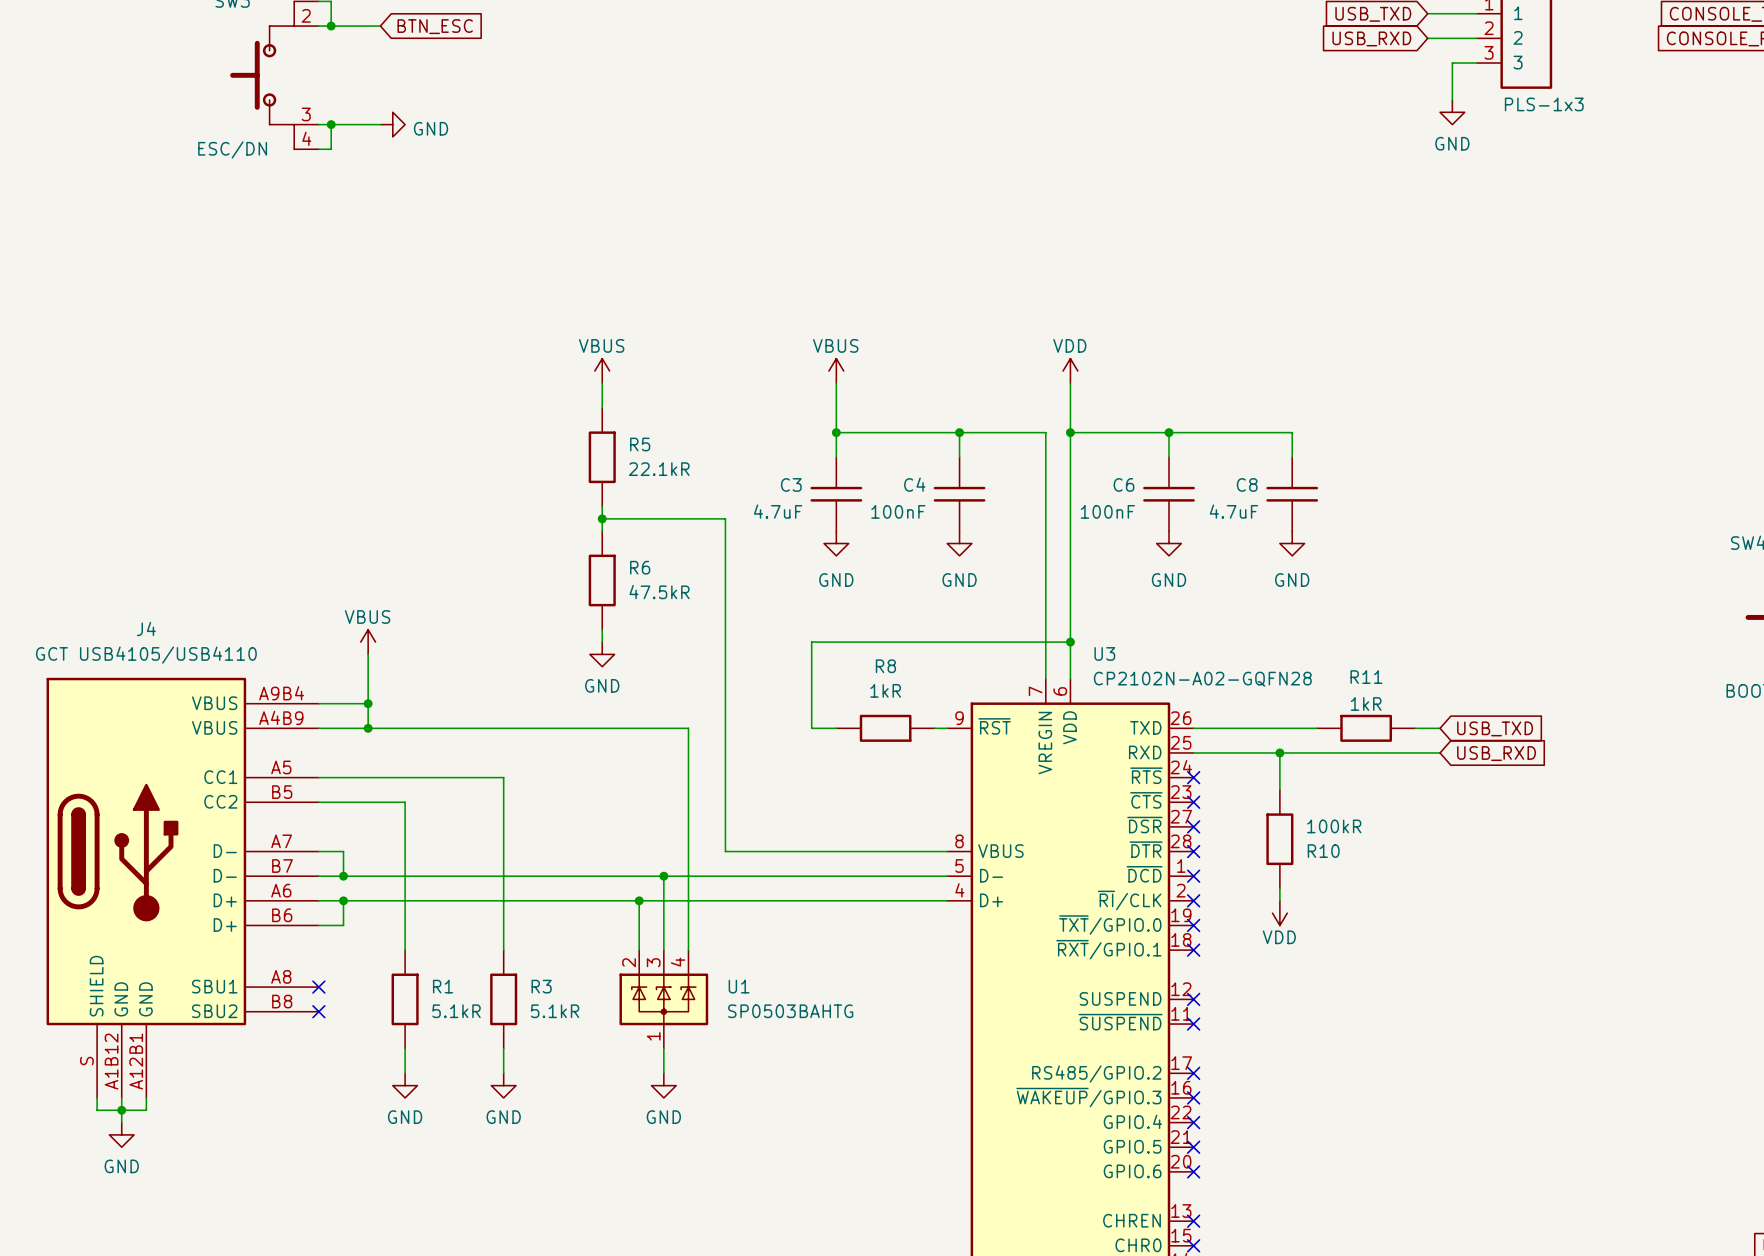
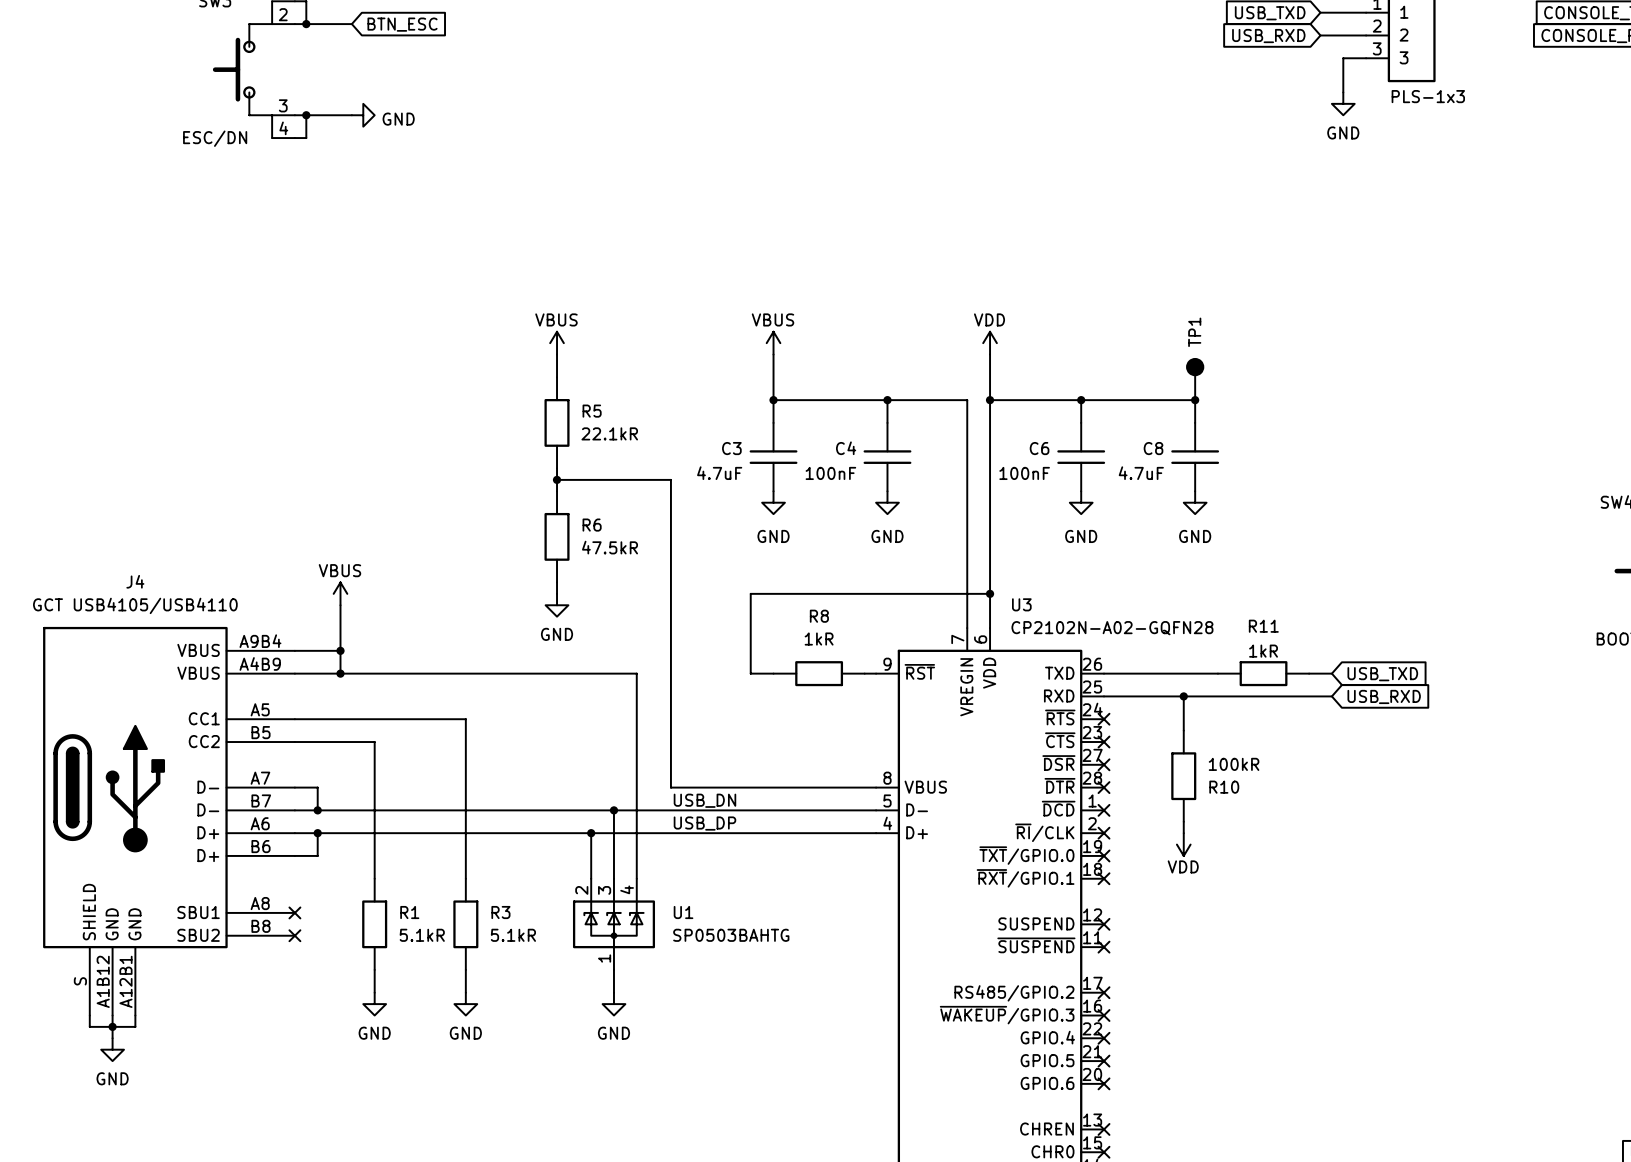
TP1: none -> (1195, 379)
junction: none -> (1195, 400)
label: none -> USB_DN (704, 800)
label: none -> USB_DP (704, 823)

